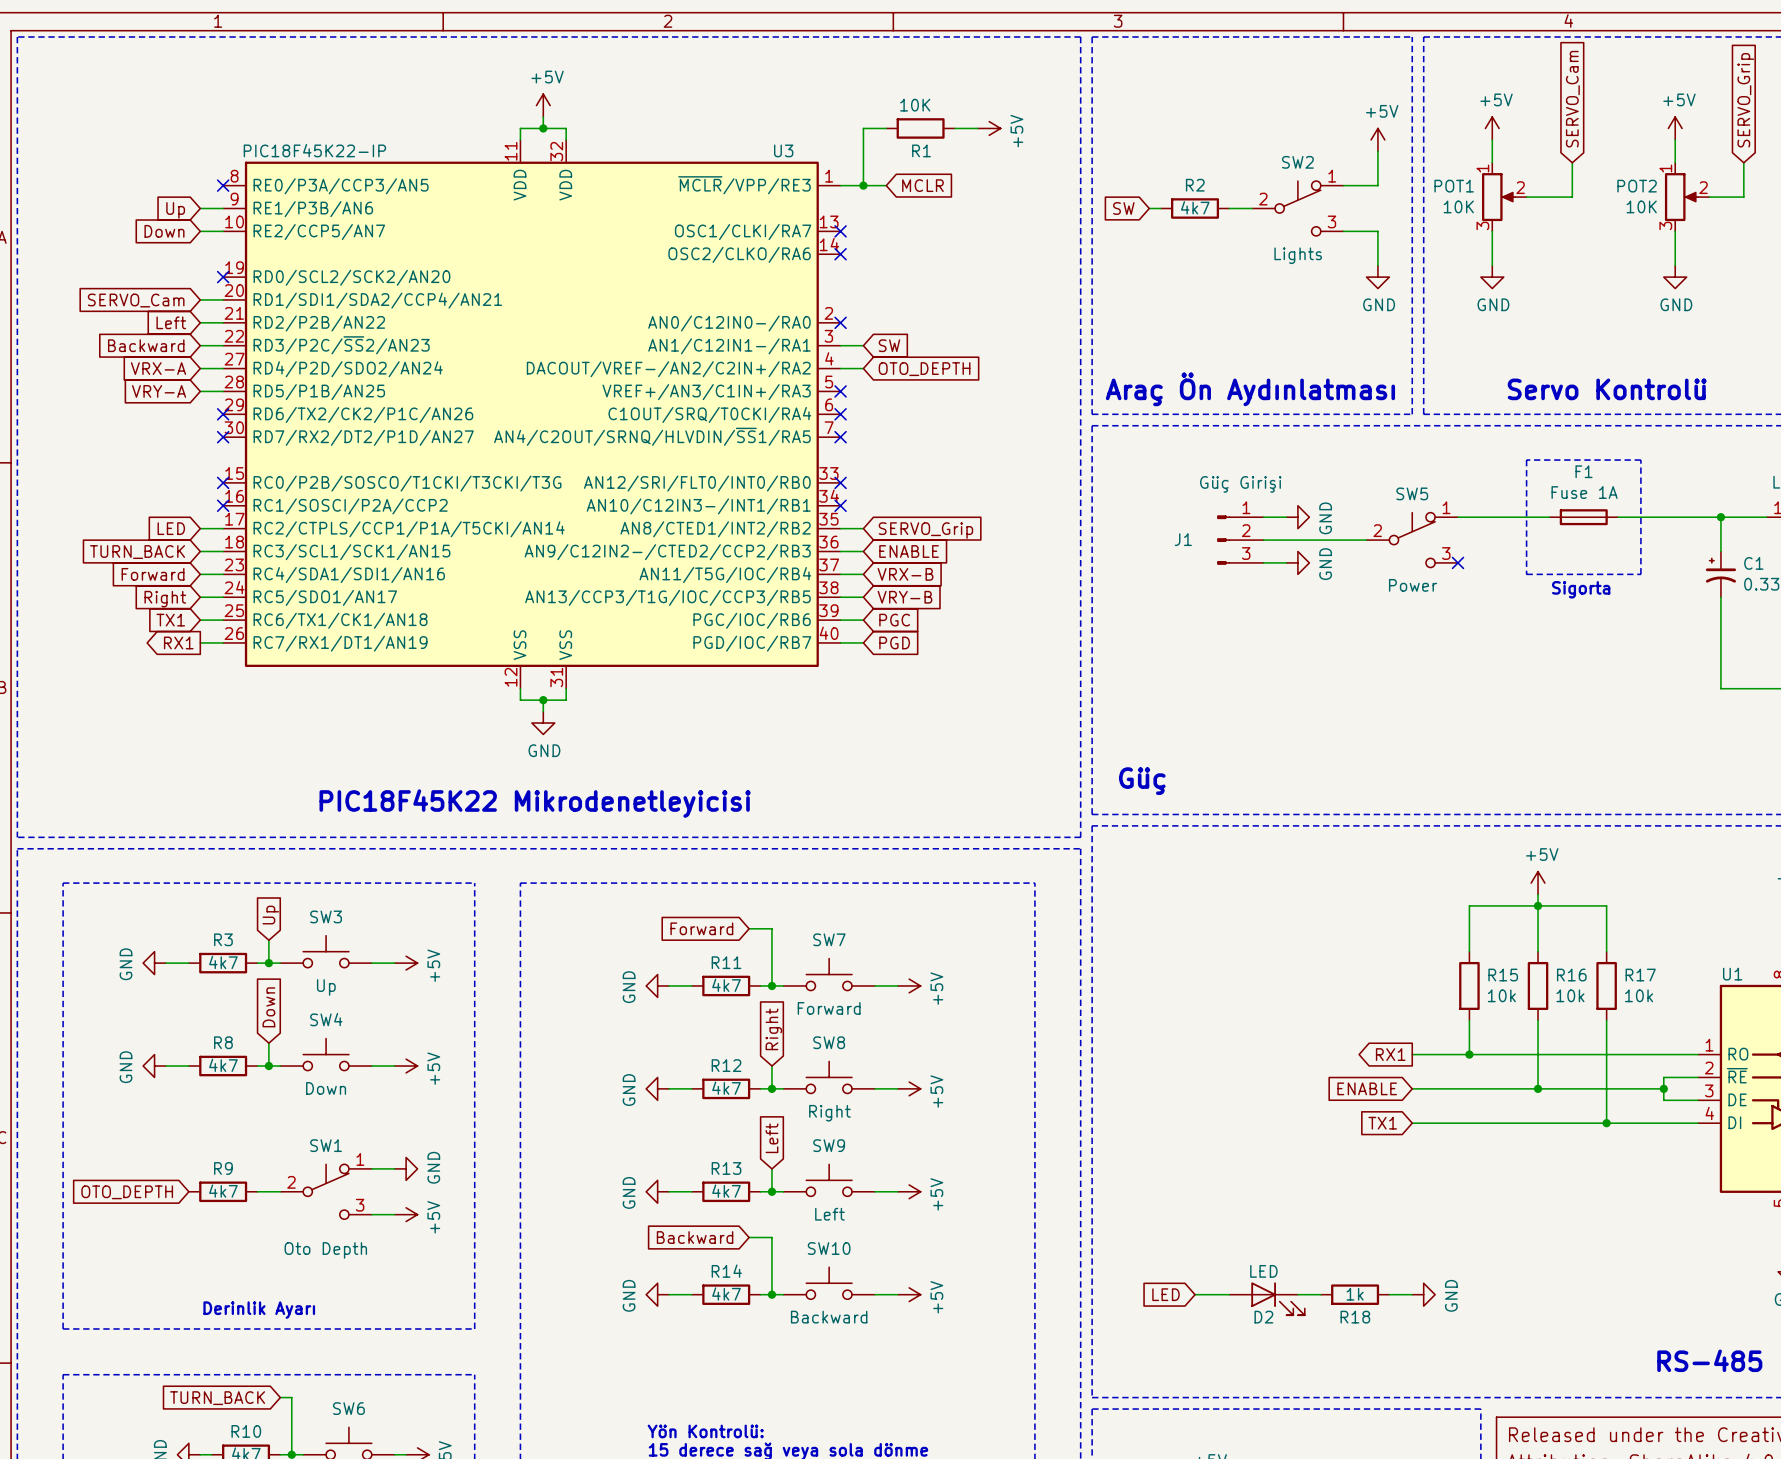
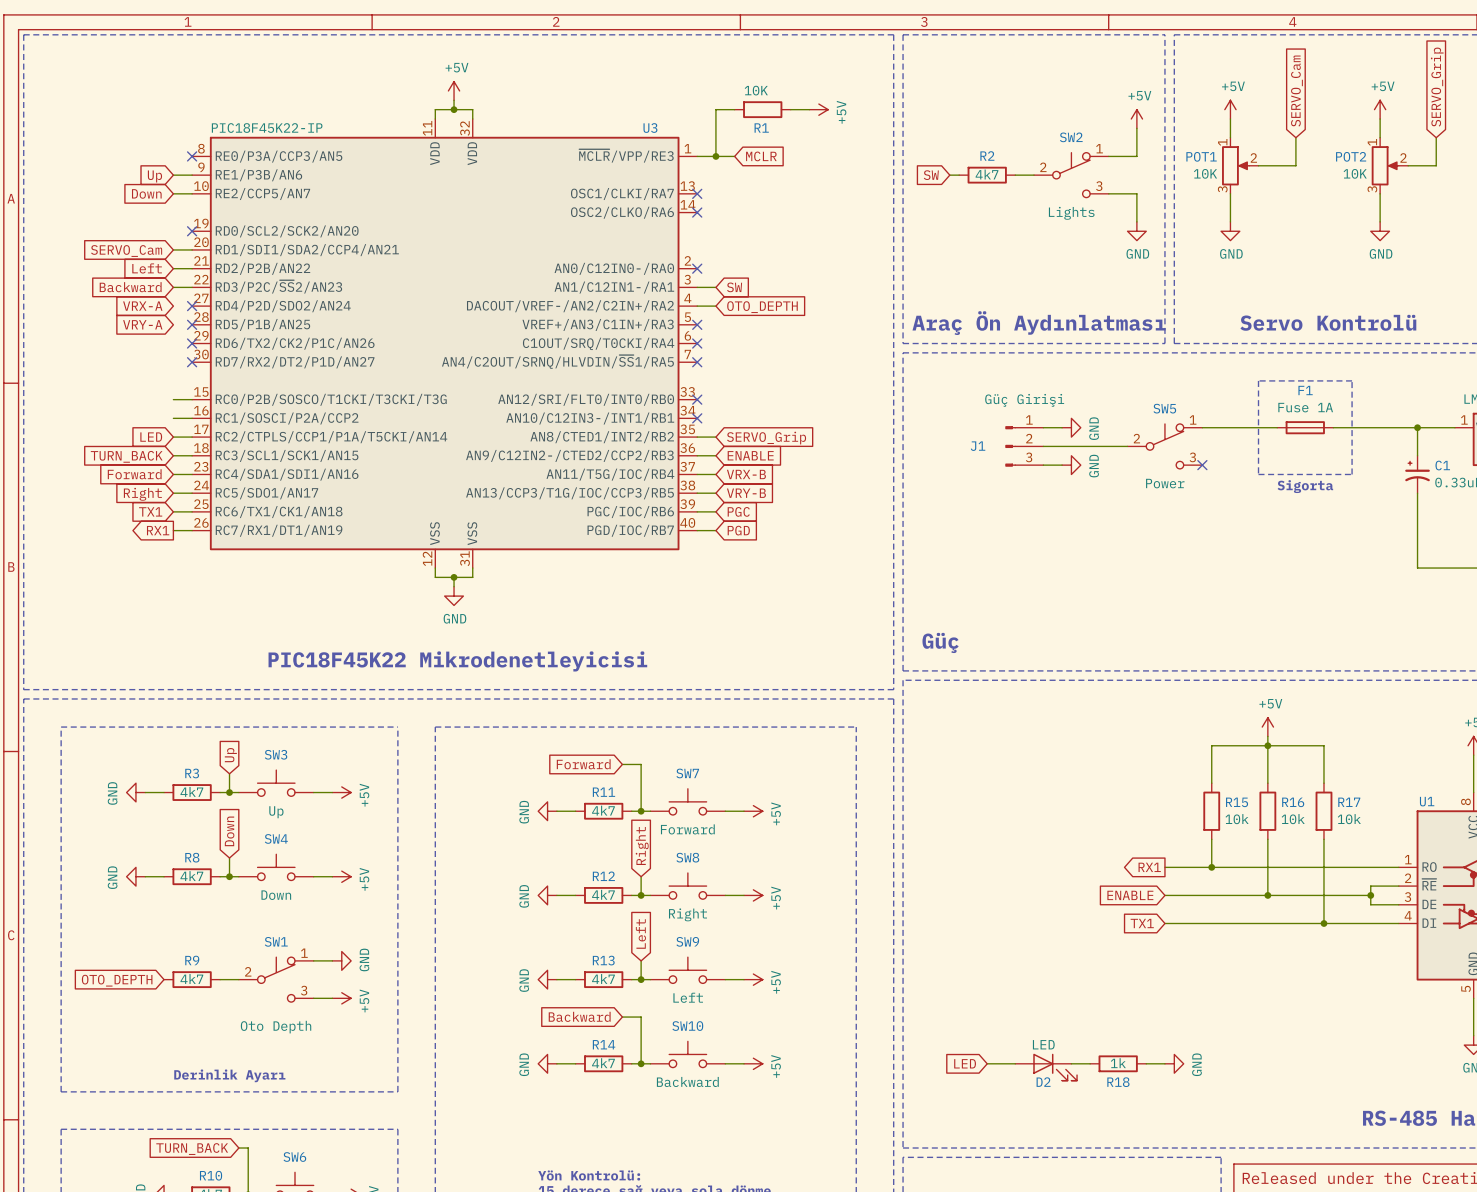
wire: (200, 368) (223, 368) -> (173, 399) (192, 399)
no-connect mark: none -> (192, 306)
wire: (200, 391) (223, 391) -> (173, 418) (192, 418)
no-connect mark: none -> (192, 324)
no-connect mark: (223, 482) -> none
no-connect mark: (223, 505) -> none

